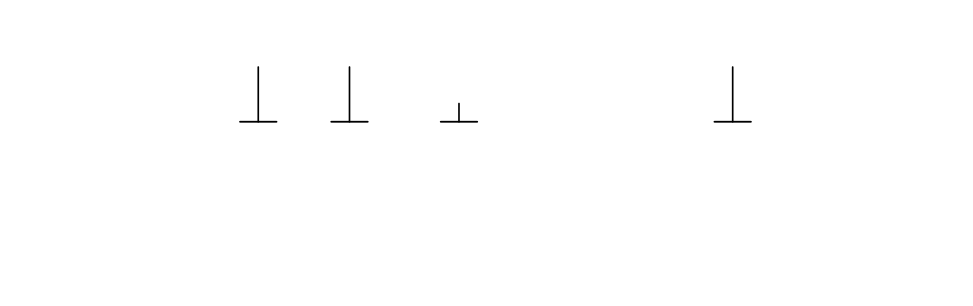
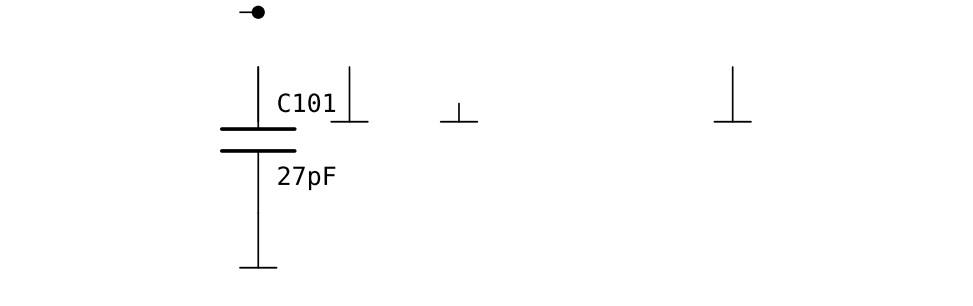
wire: none -> (240, 12) (258, 12)
junction: none -> (258, 12)
power symbol position: (258, 121) -> (258, 267)
C101: none -> 27pF (258, 140)
wire: none -> (258, 212) (258, 267)

